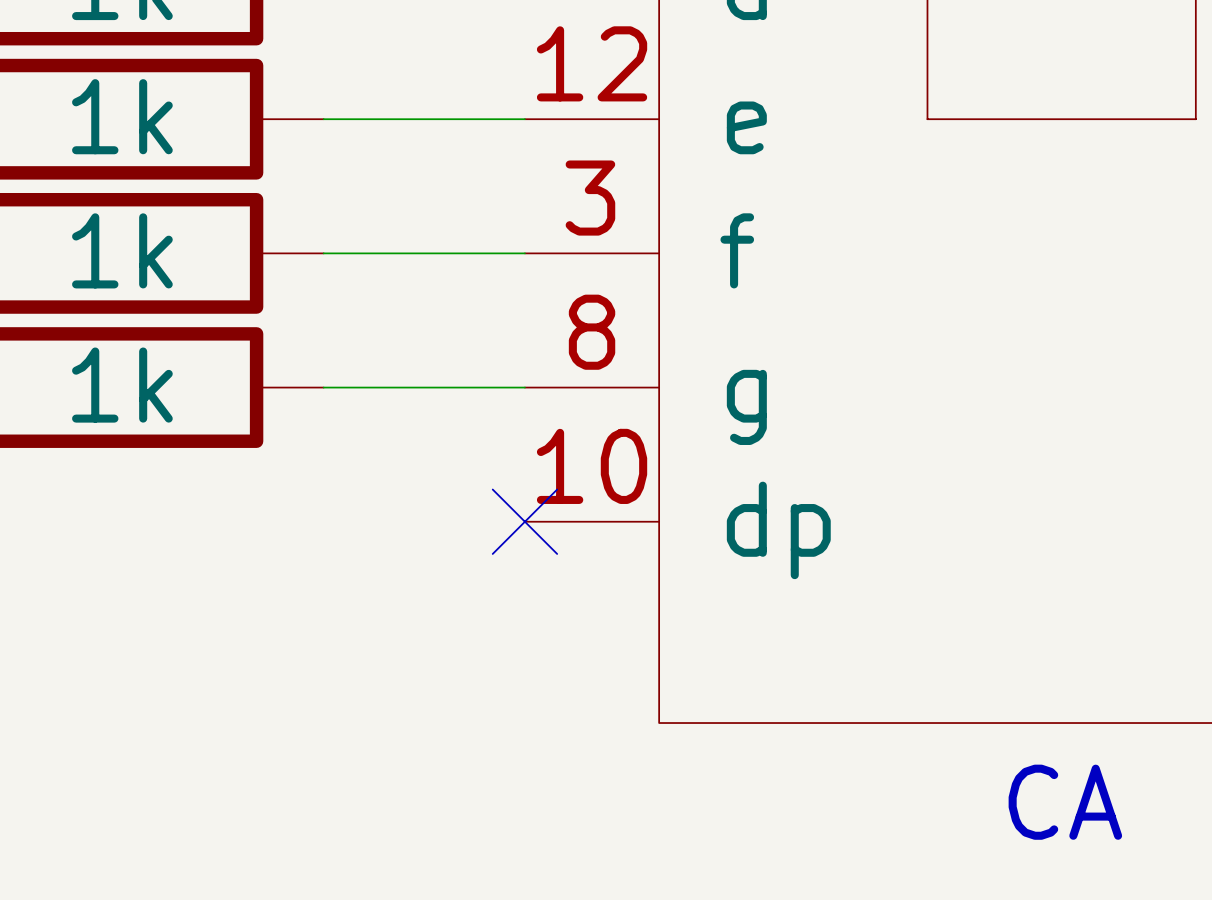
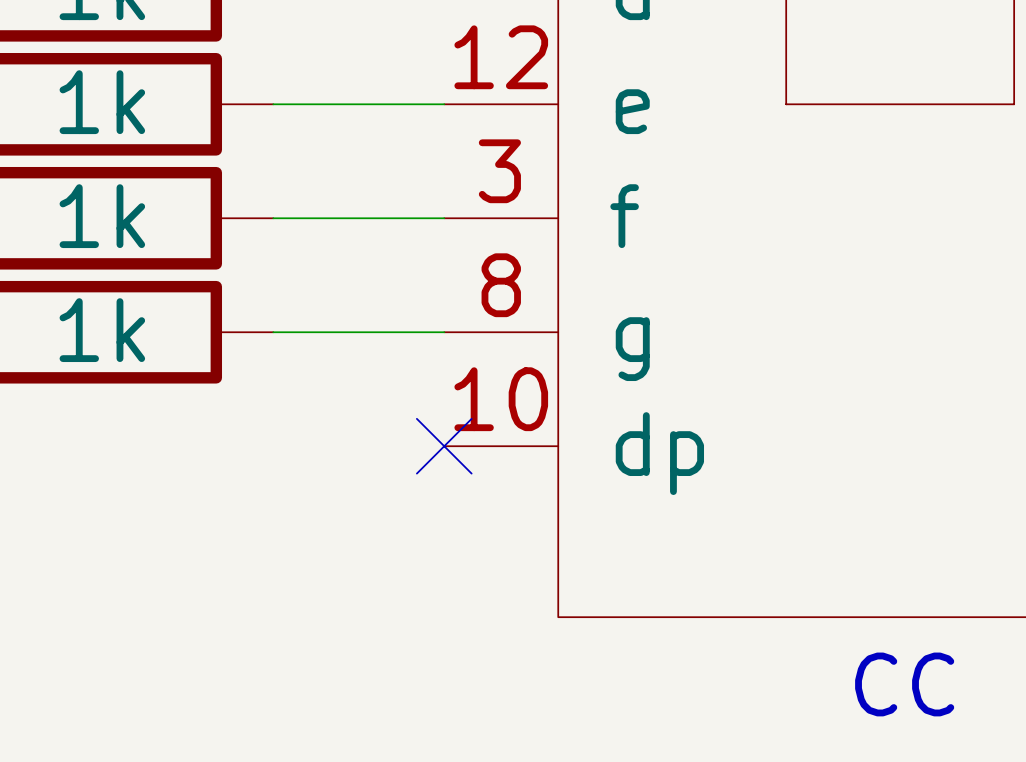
text: CA (1065, 802) -> CC (904, 684)

